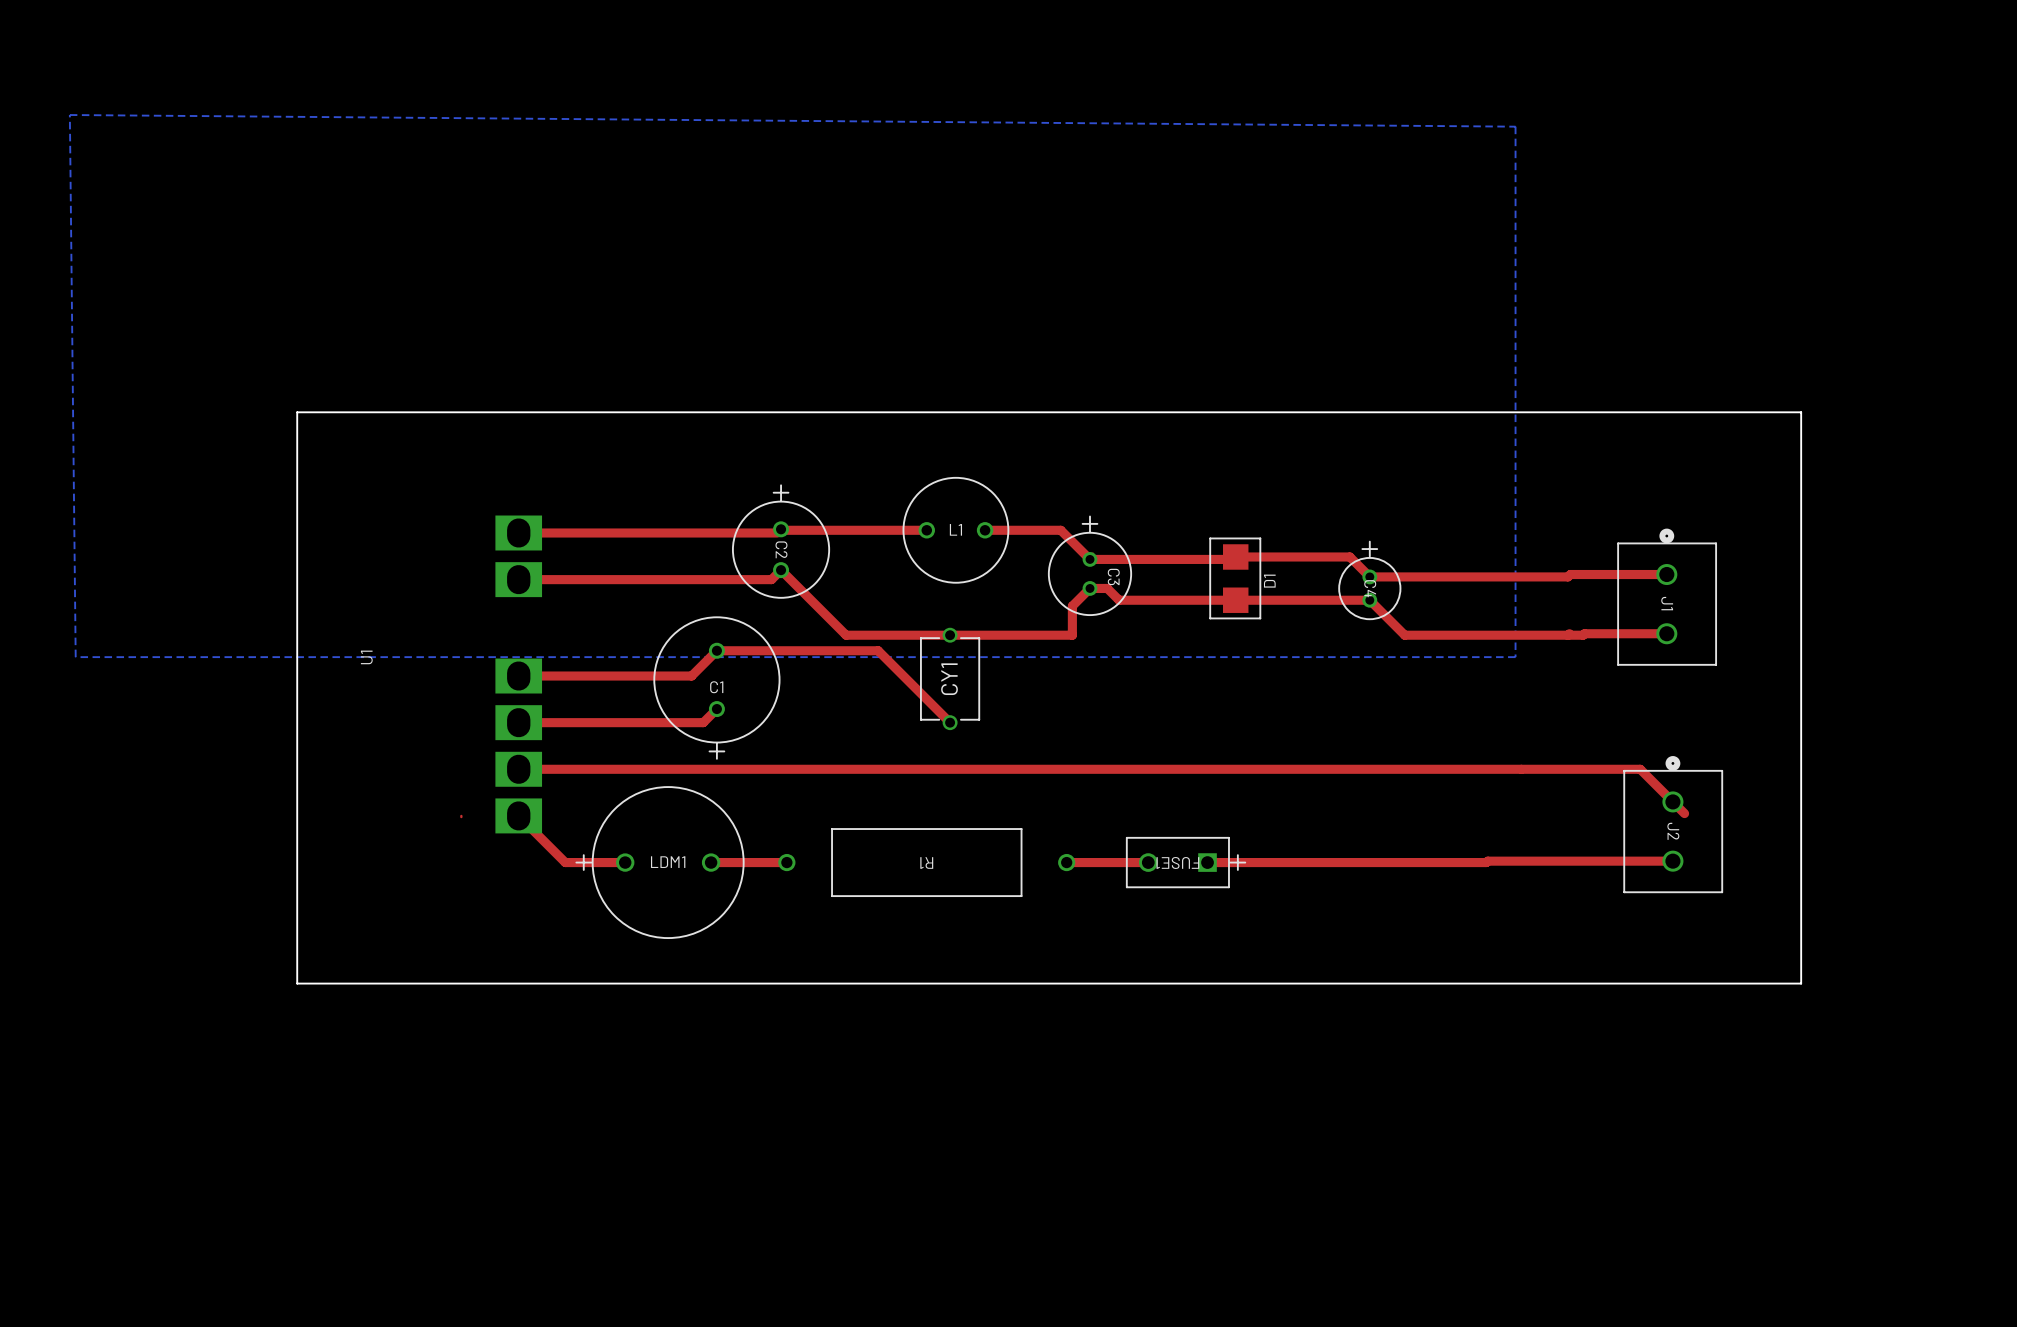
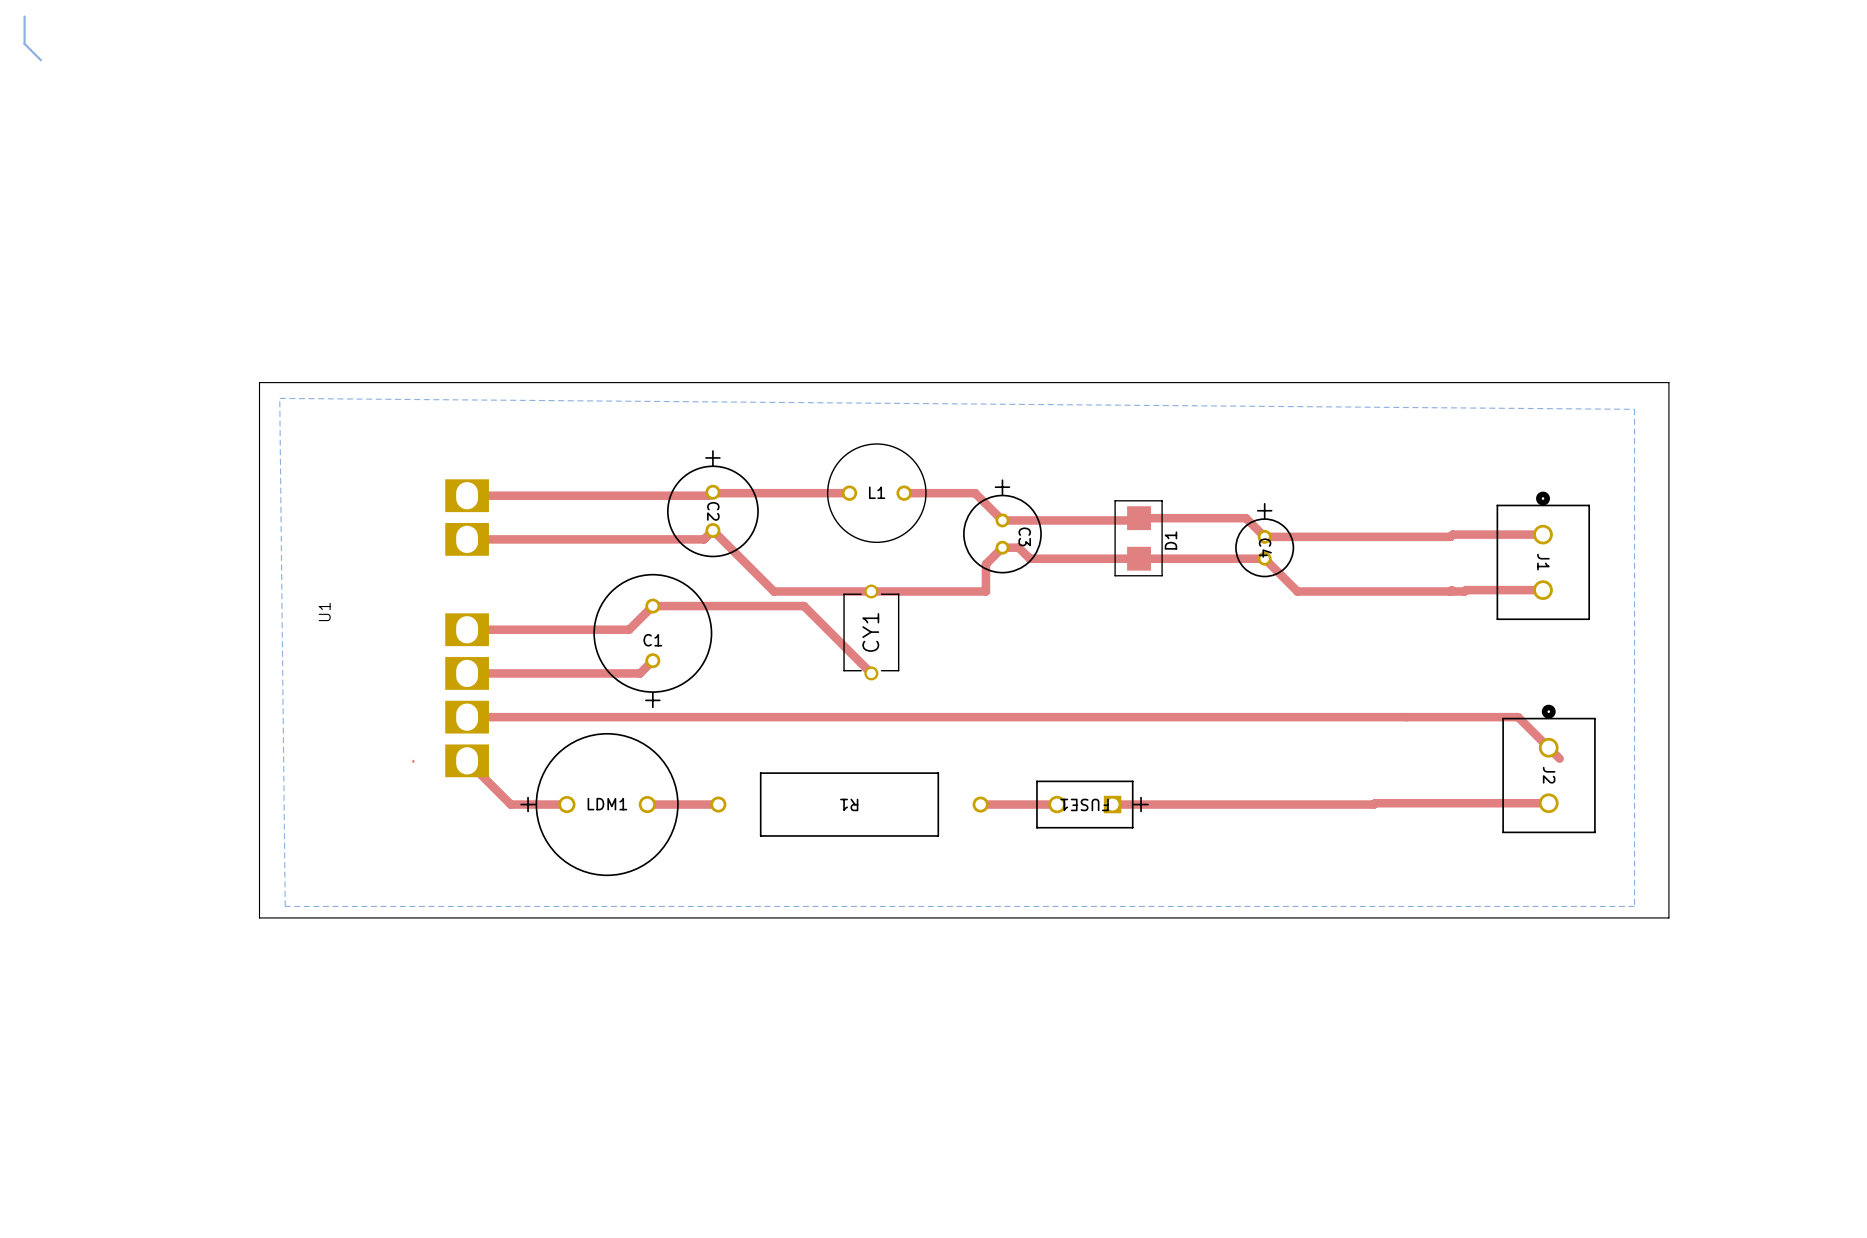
bottom track: none -> (24, 16) (24, 43) (40, 60)
bottom zone outline: (69, 115) (1515, 126) (1515, 657) (75, 657) (69, 115) -> none
bottom zone outline: none -> (279, 398) (1634, 409) (1634, 906) (285, 906) (279, 398)

